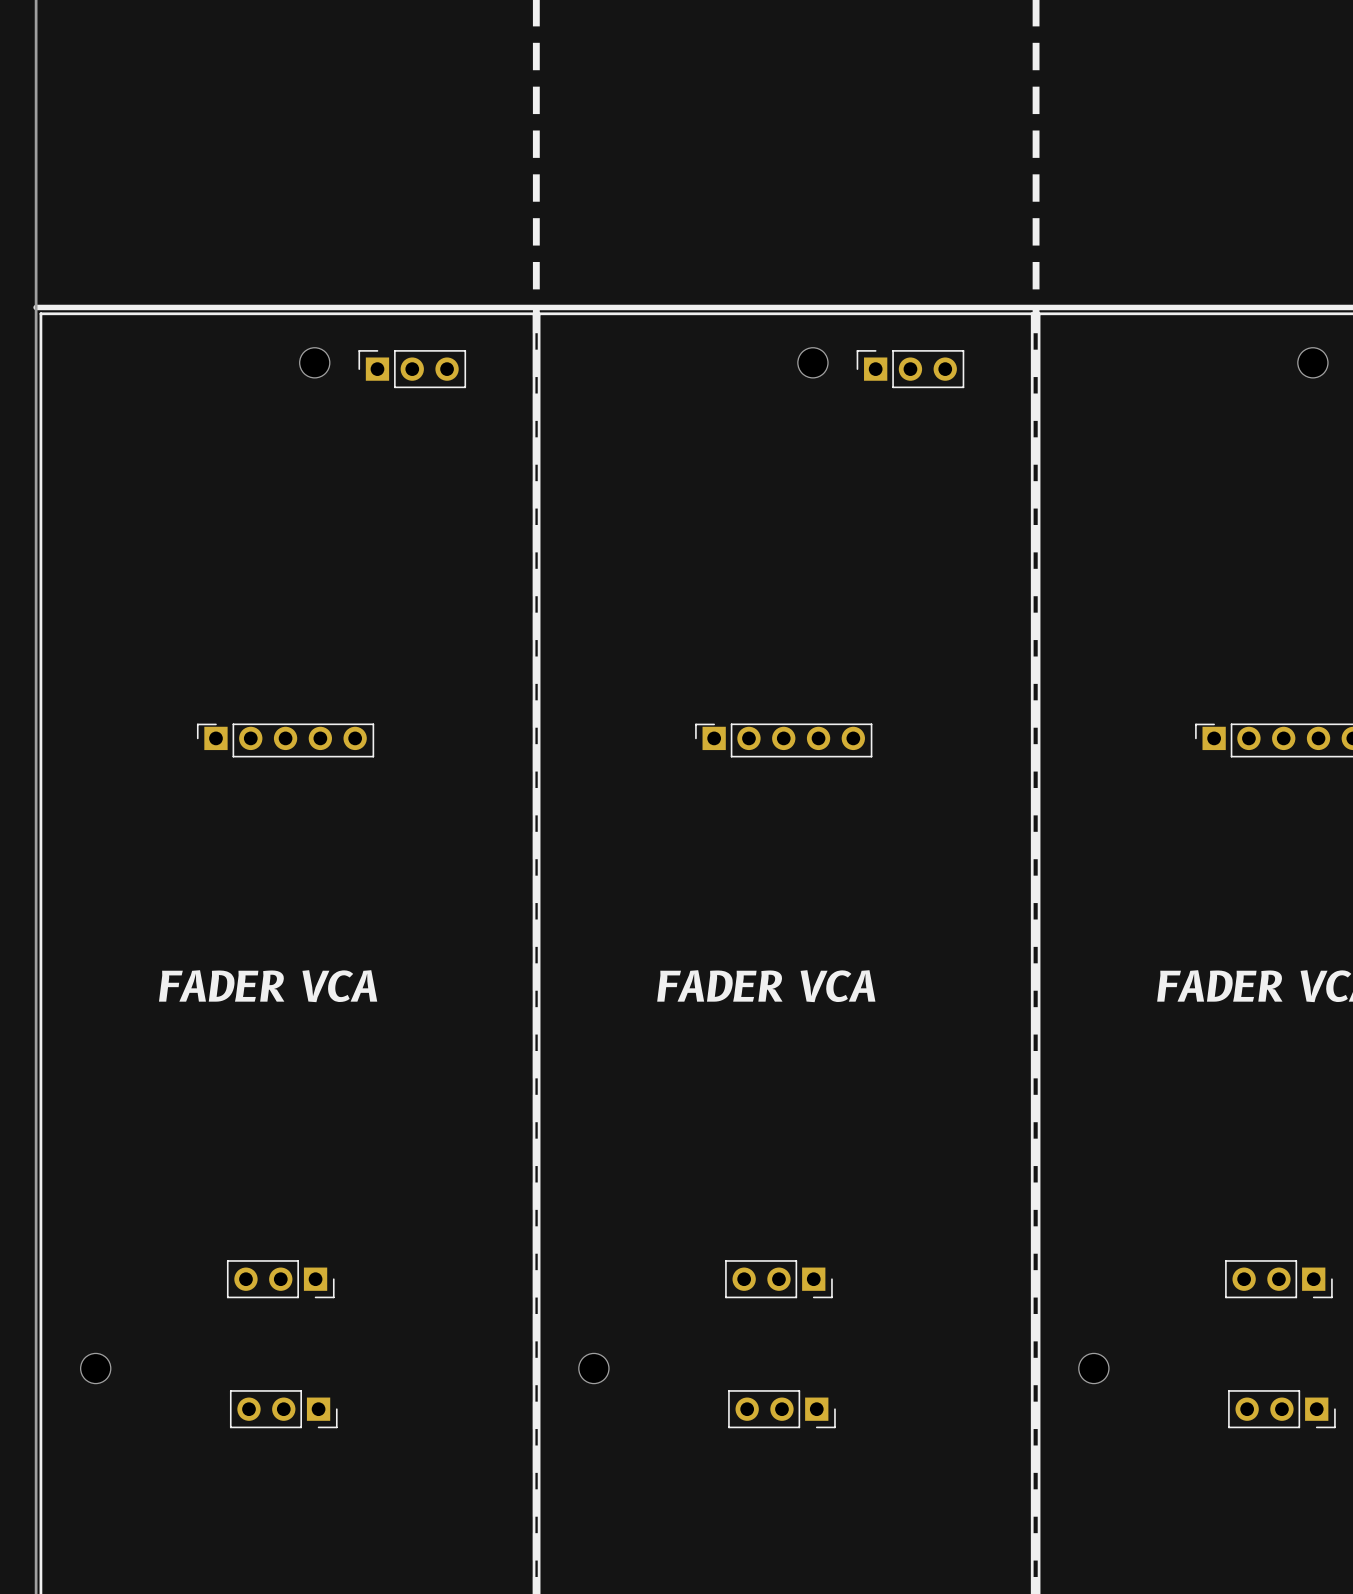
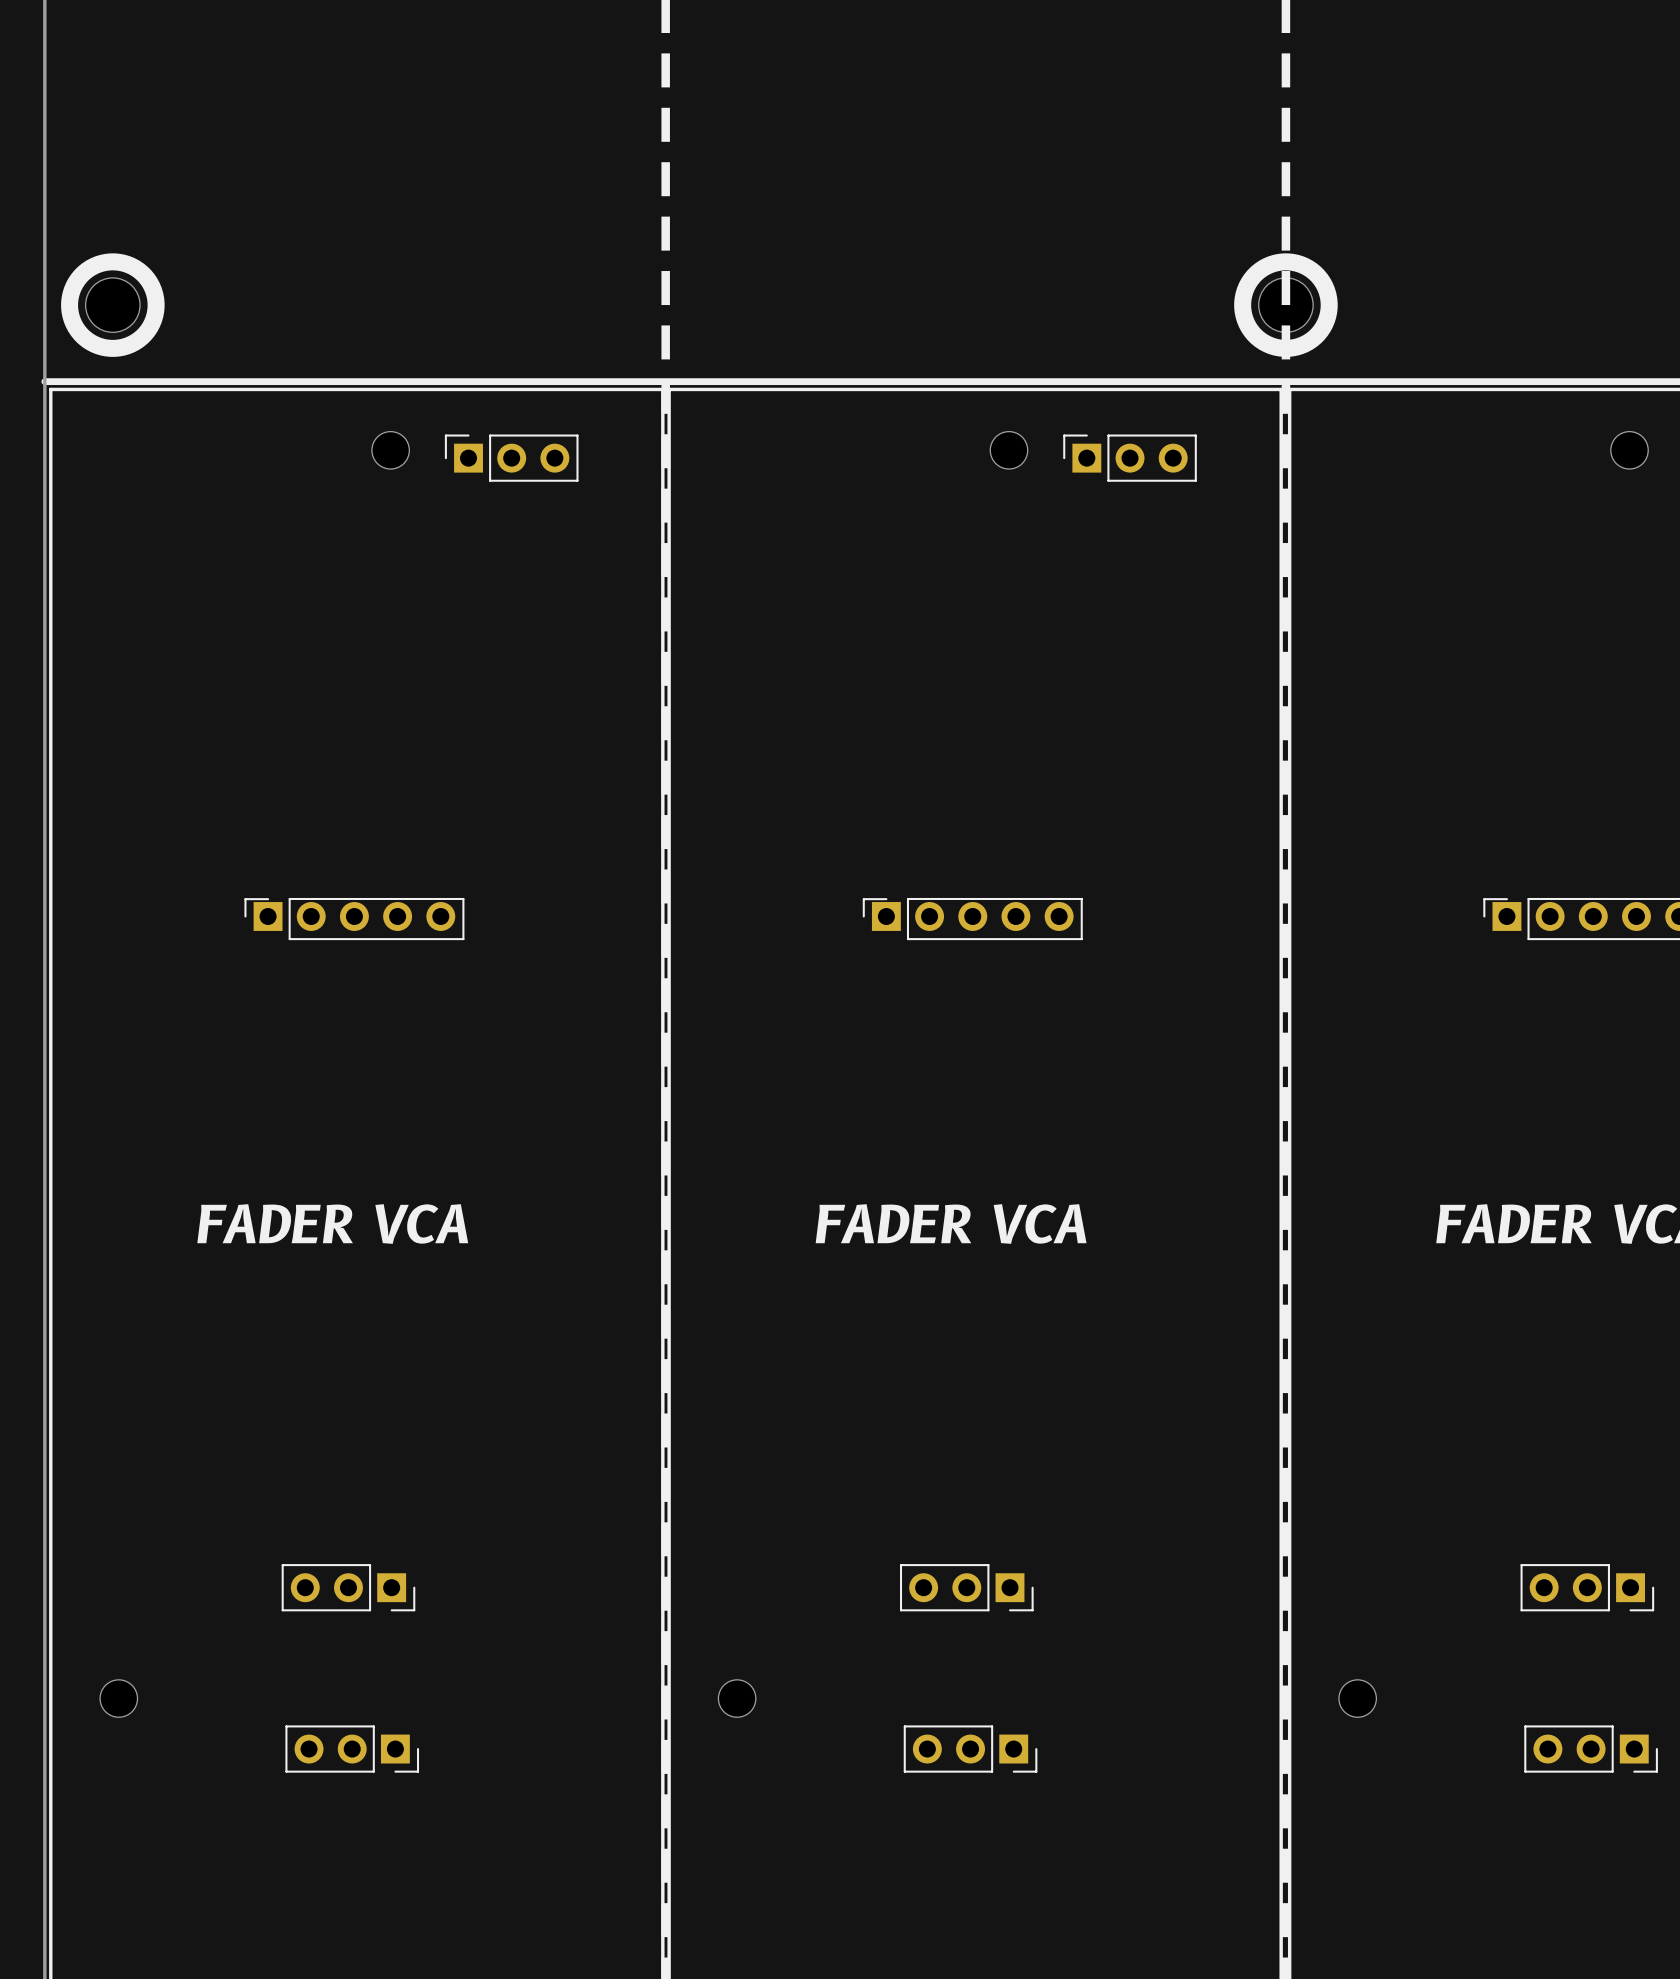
part: none -> (112, 305)
part: none -> (1285, 305)

